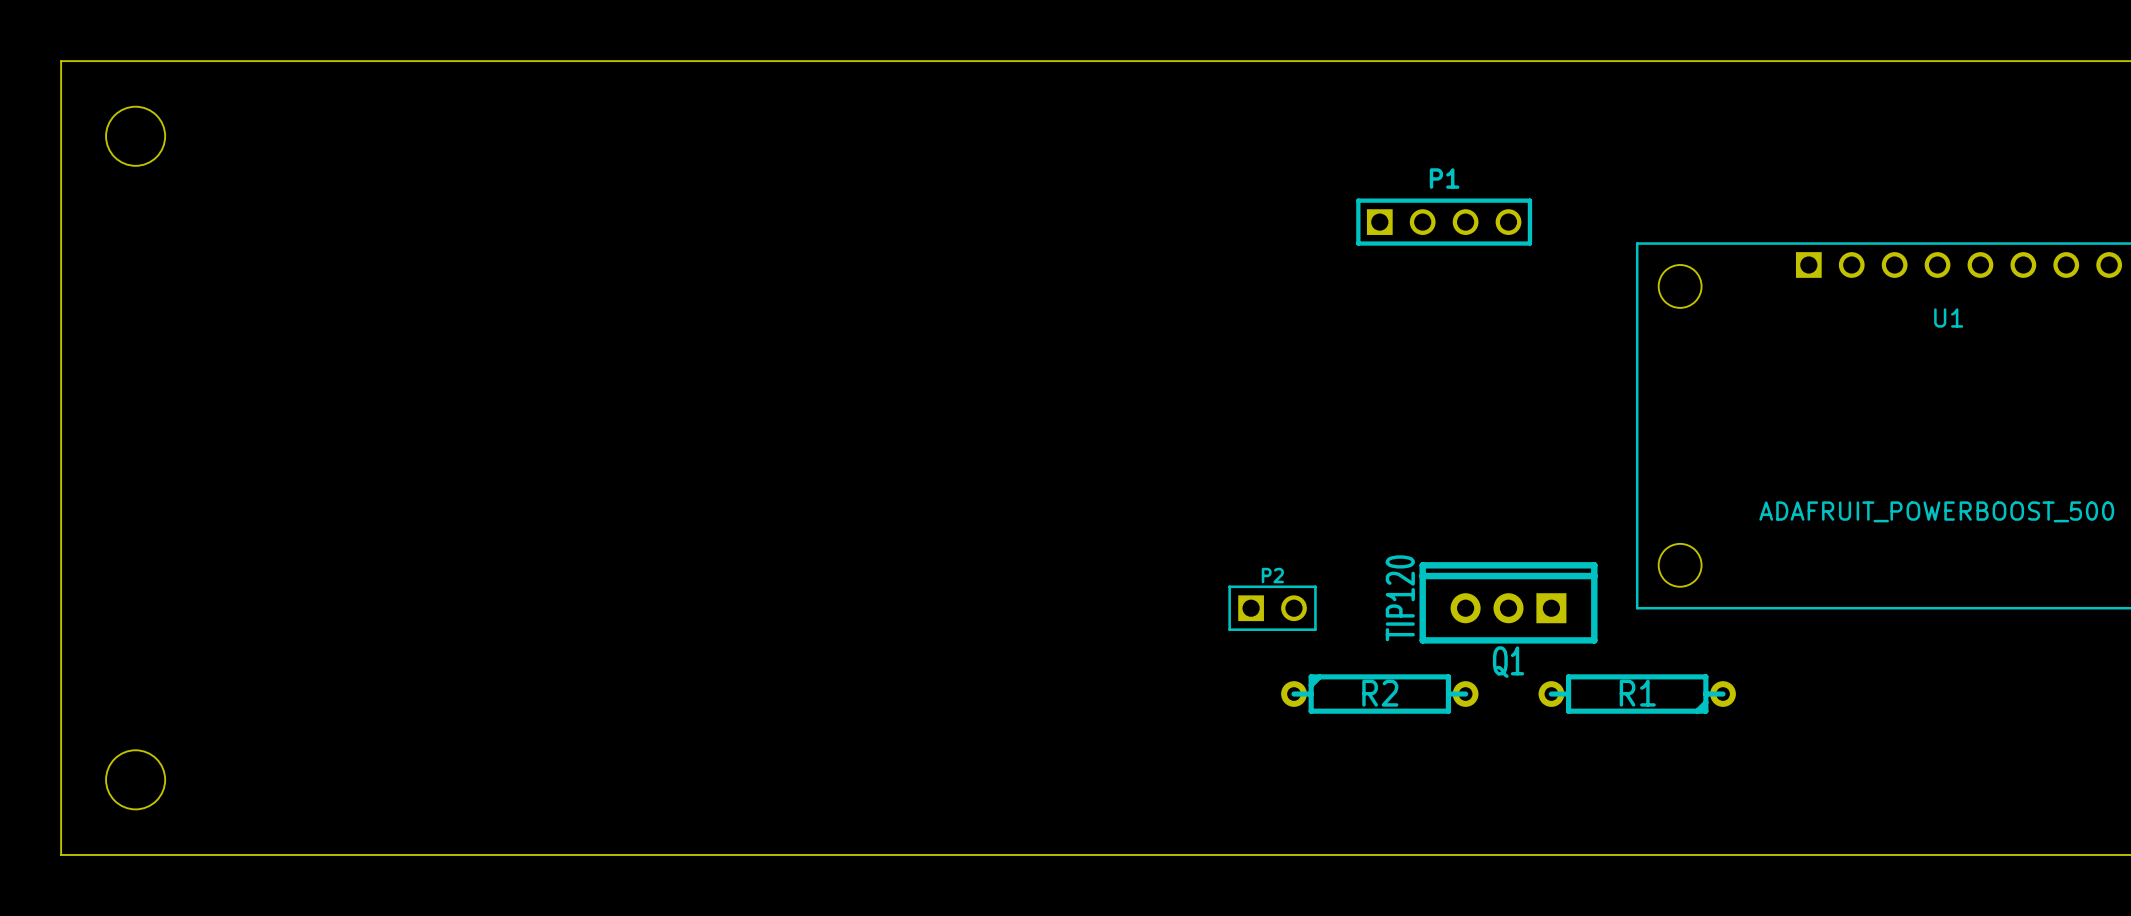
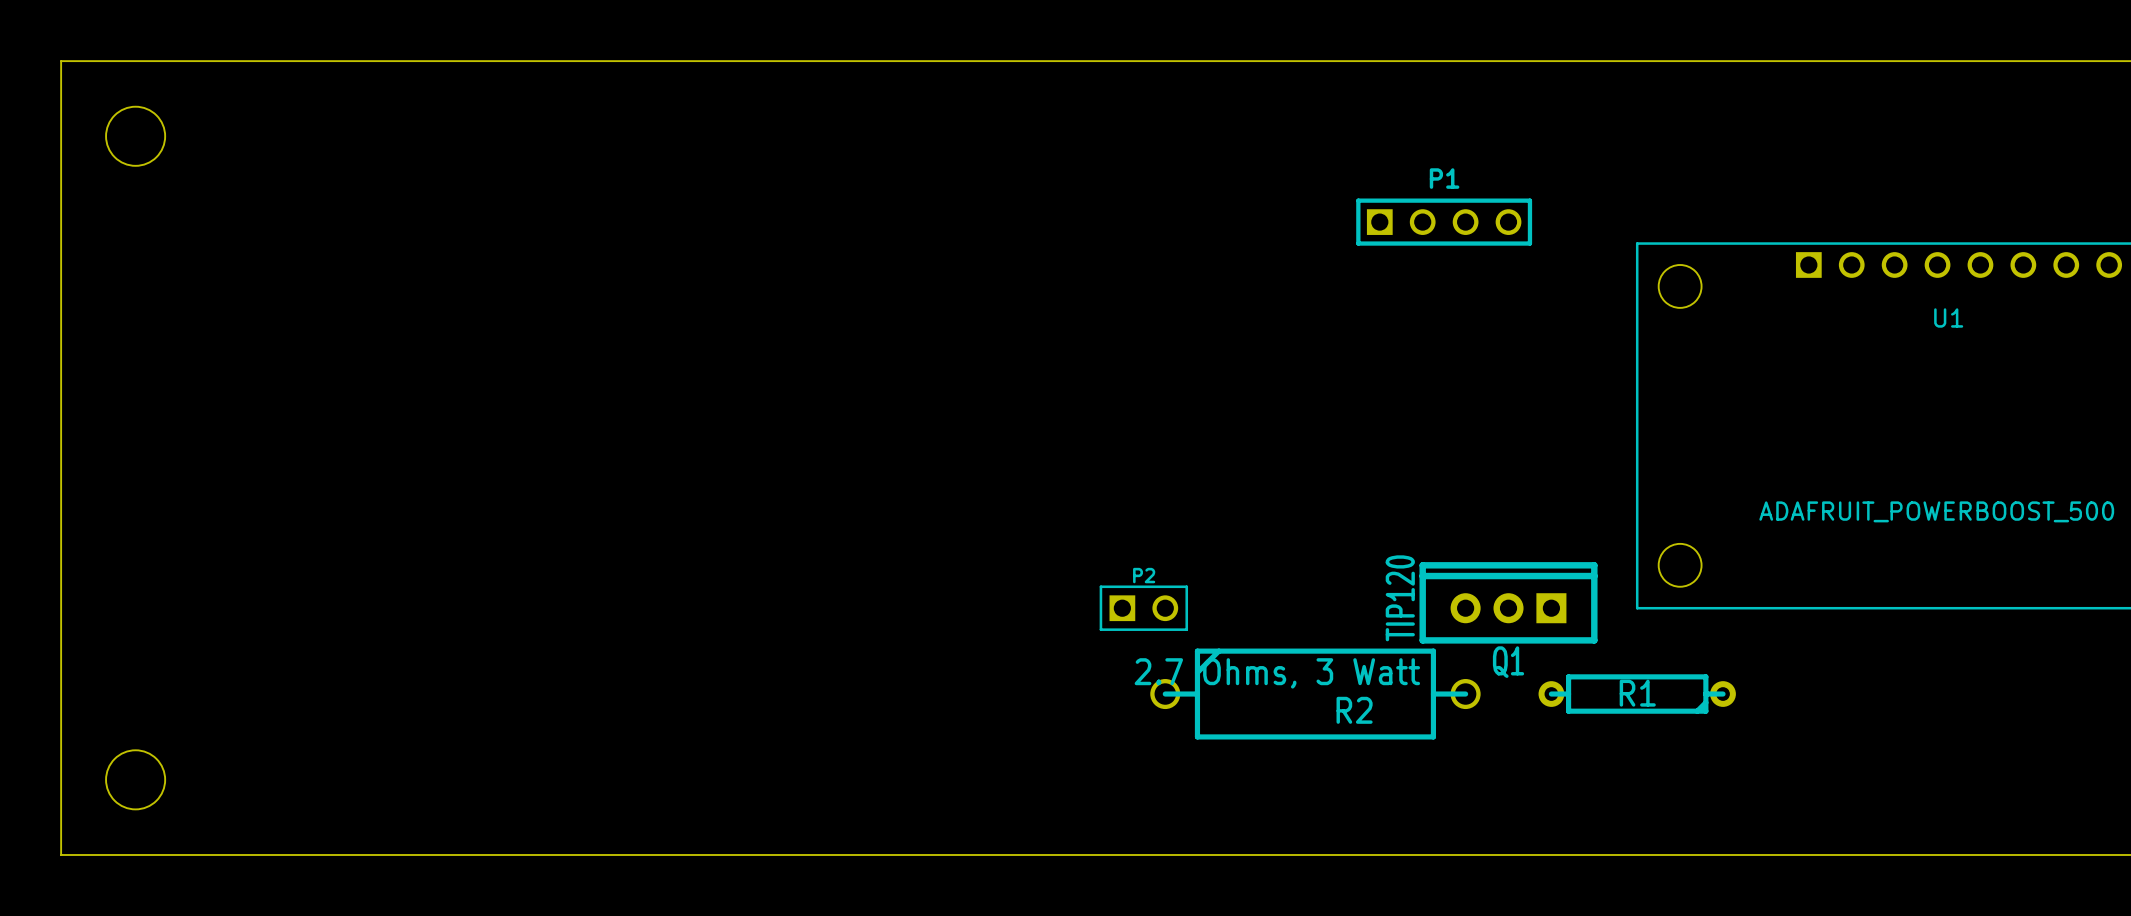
P2 position: (1272, 608) -> (1143, 608)
R2 value: none -> 2.7 Ohms, 3 Watt (1277, 673)
R2 footprint: [1281, 674, 1479, 714] -> [1150, 648, 1481, 740]
R2 name position: R2 (1380, 693) -> R2 (1354, 710)

